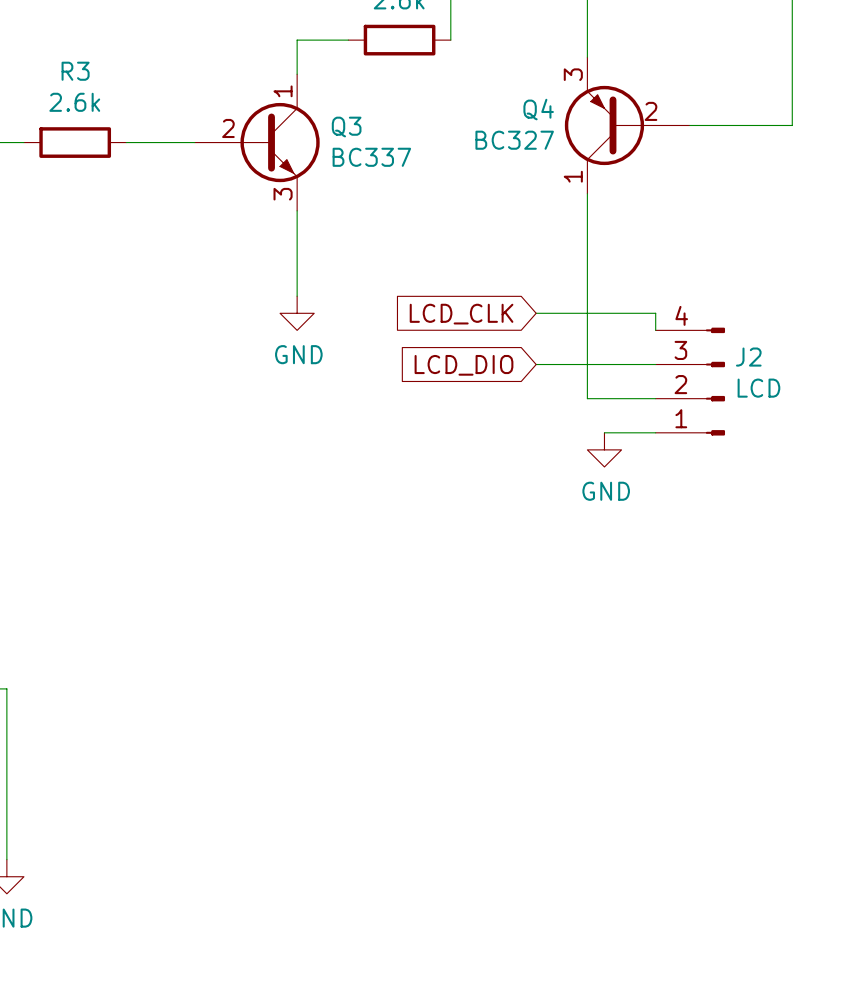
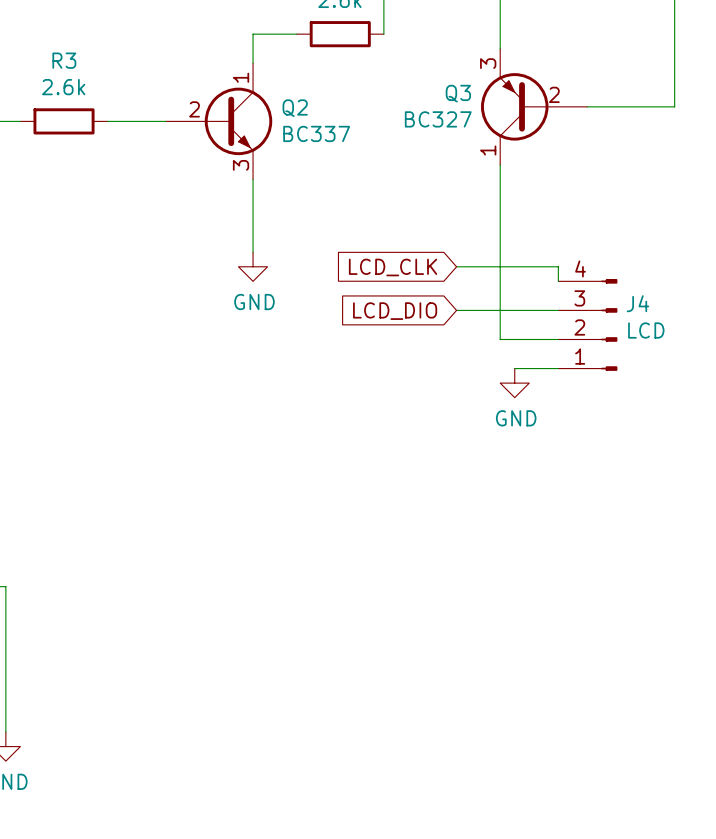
Q4 name: Q4 (538, 109) -> Q3 (458, 93)
Q3 name: Q3 (346, 127) -> Q2 (295, 108)
J2 name: J2 (748, 357) -> J4 (637, 303)

